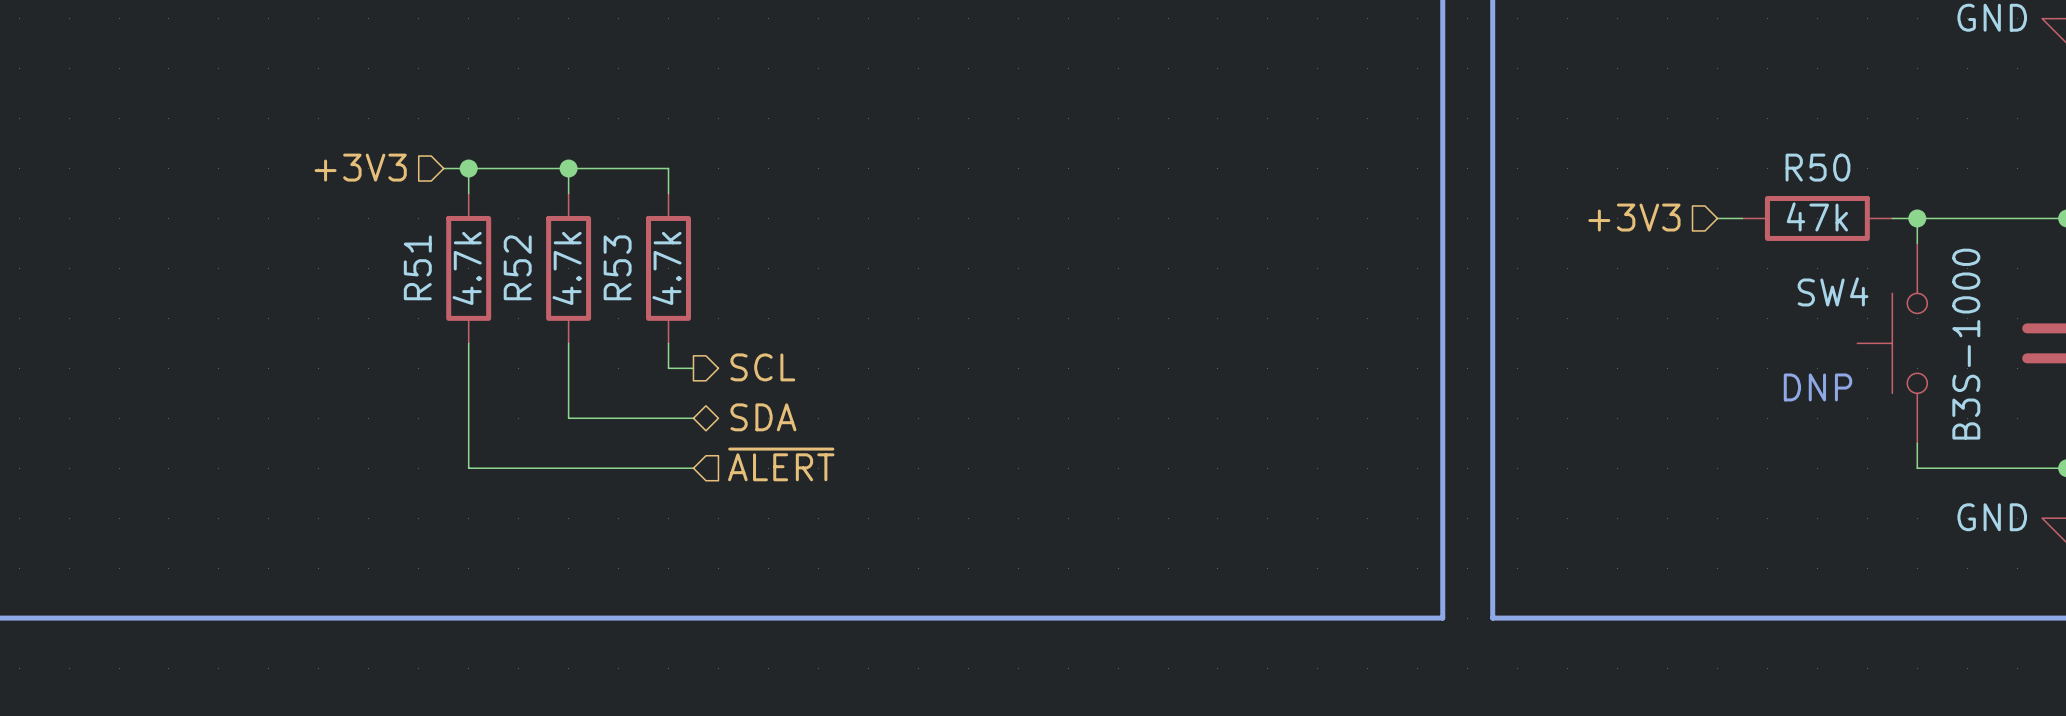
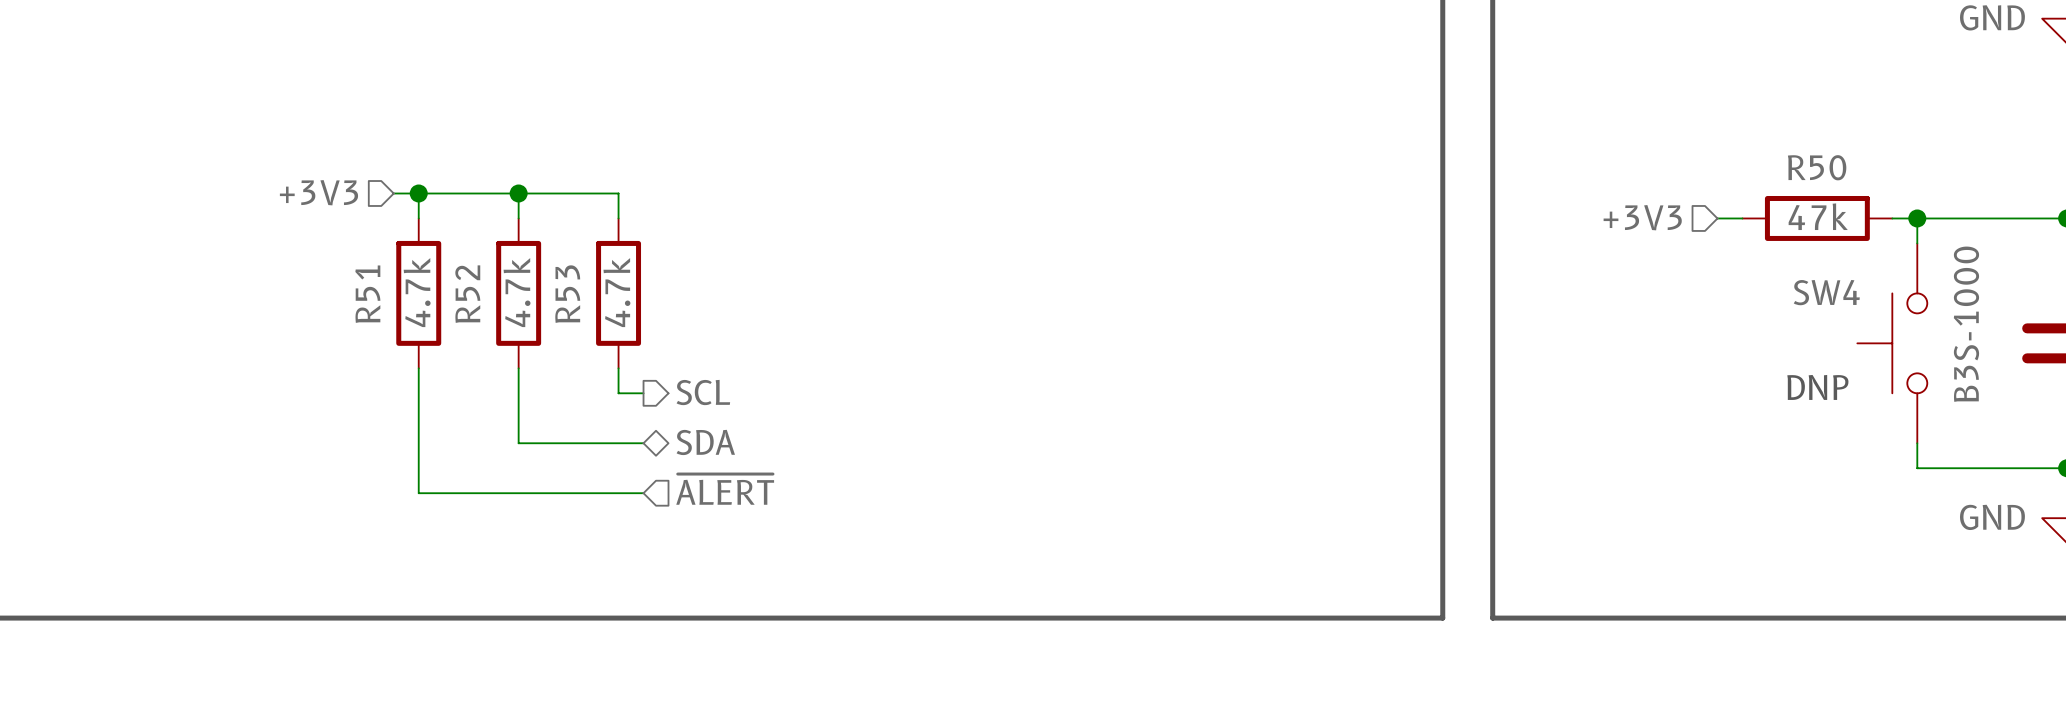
hierarchical label position: +3V3 (360, 167) -> +3V3 (318, 192)
wire: (443, 168) (668, 168) (668, 193) -> (393, 193) (618, 193) (618, 218)
wire: (468, 168) (468, 193) -> (418, 193) (418, 218)
junction: (468, 168) -> none
wire: (568, 168) (568, 193) -> (518, 193) (518, 218)
junction: (568, 168) -> none
junction: none -> (418, 193)
junction: none -> (518, 193)
R51 position: (468, 268) -> (418, 293)
R52 position: (568, 268) -> (518, 293)
R53 position: (668, 268) -> (618, 293)
wire: (468, 343) (468, 468) (693, 468) -> (418, 368) (418, 493) (643, 493)
wire: (568, 343) (568, 418) (693, 418) -> (518, 368) (518, 443) (643, 443)
wire: (668, 343) (668, 368) (693, 368) -> (618, 368) (618, 393) (643, 393)
hierarchical label position: SCL (762, 367) -> SCL (703, 392)
hierarchical label position: SDA (763, 417) -> SDA (705, 442)
hierarchical label position: ~{ALERT} (781, 464) -> ~{ALERT} (725, 489)

